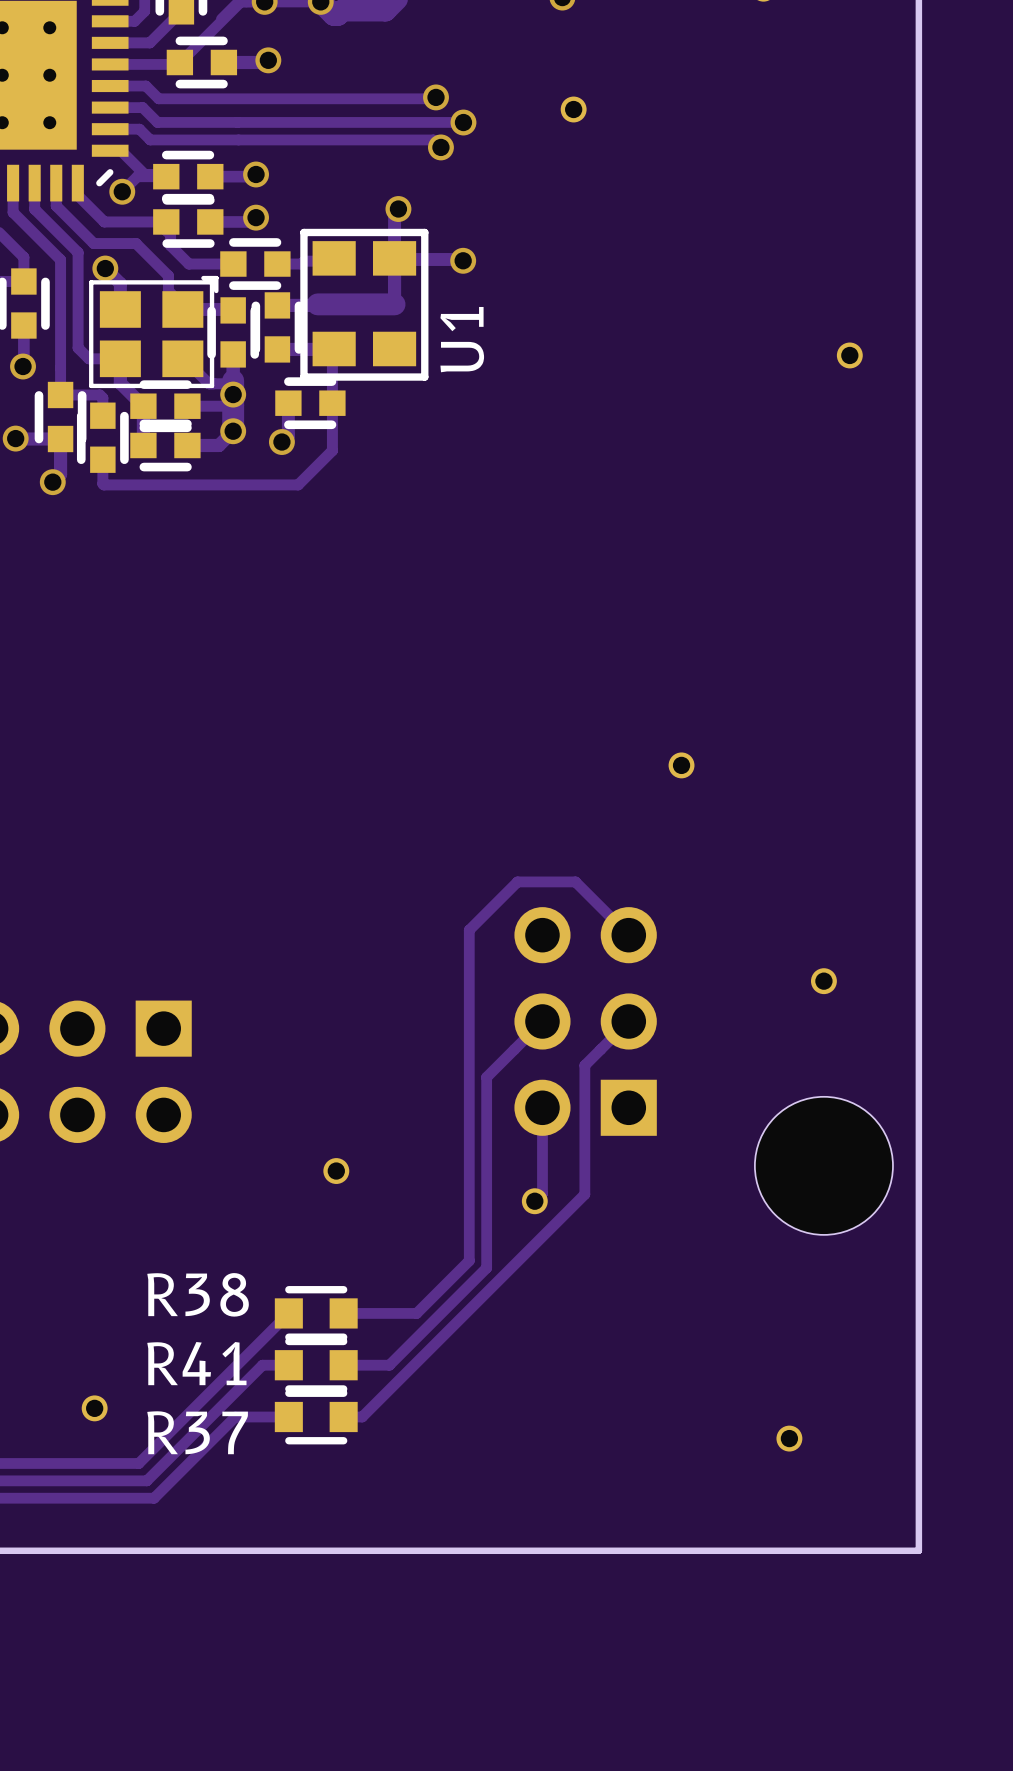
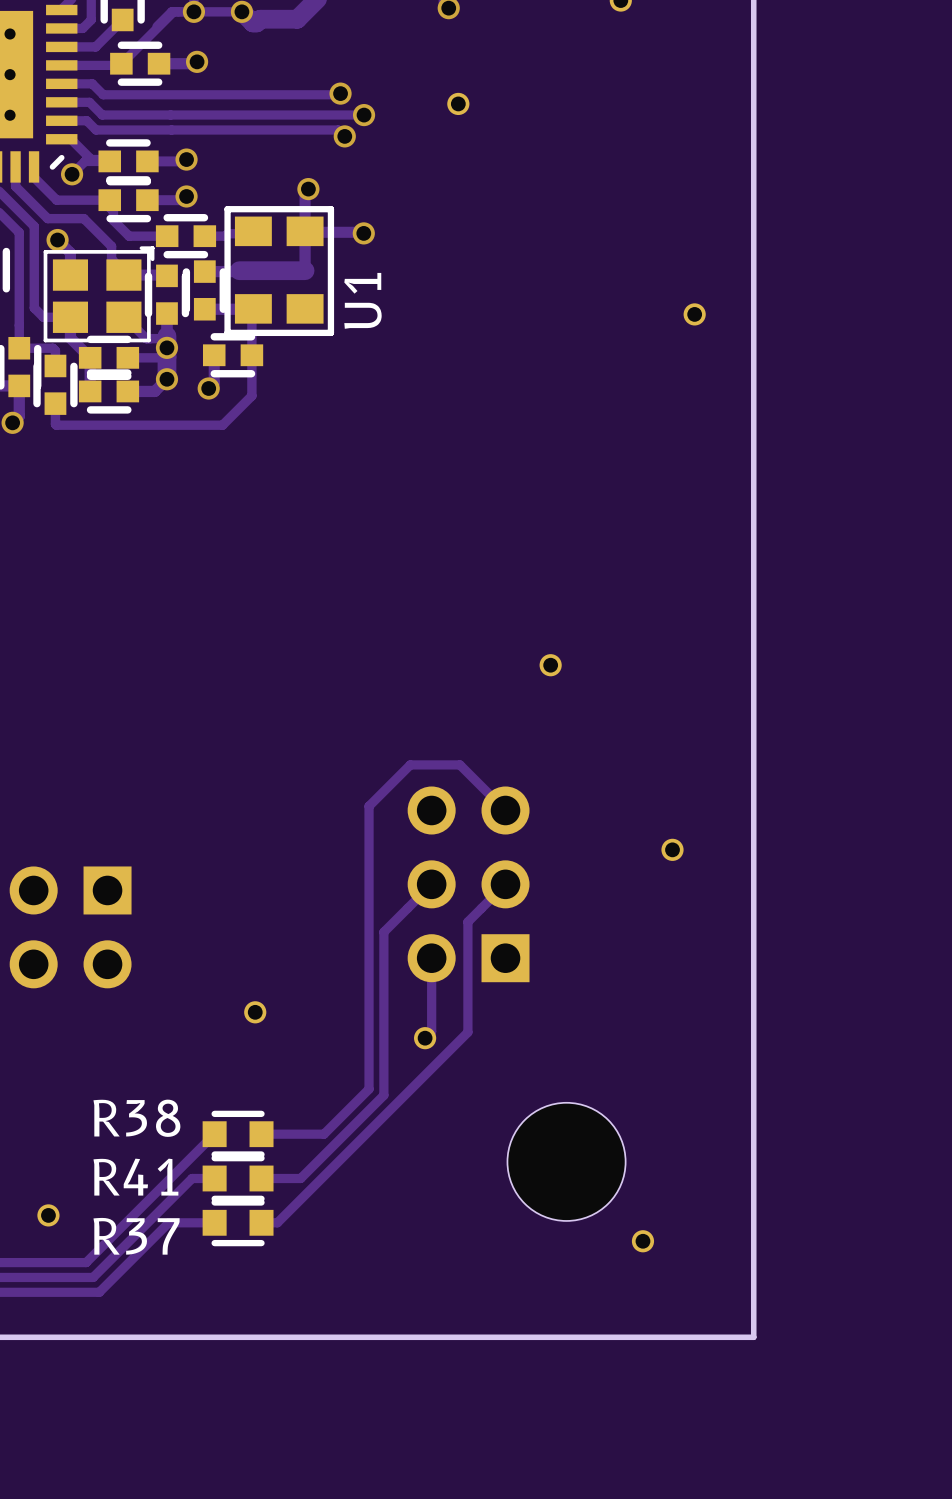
part position: (823, 1165) -> (566, 1161)

